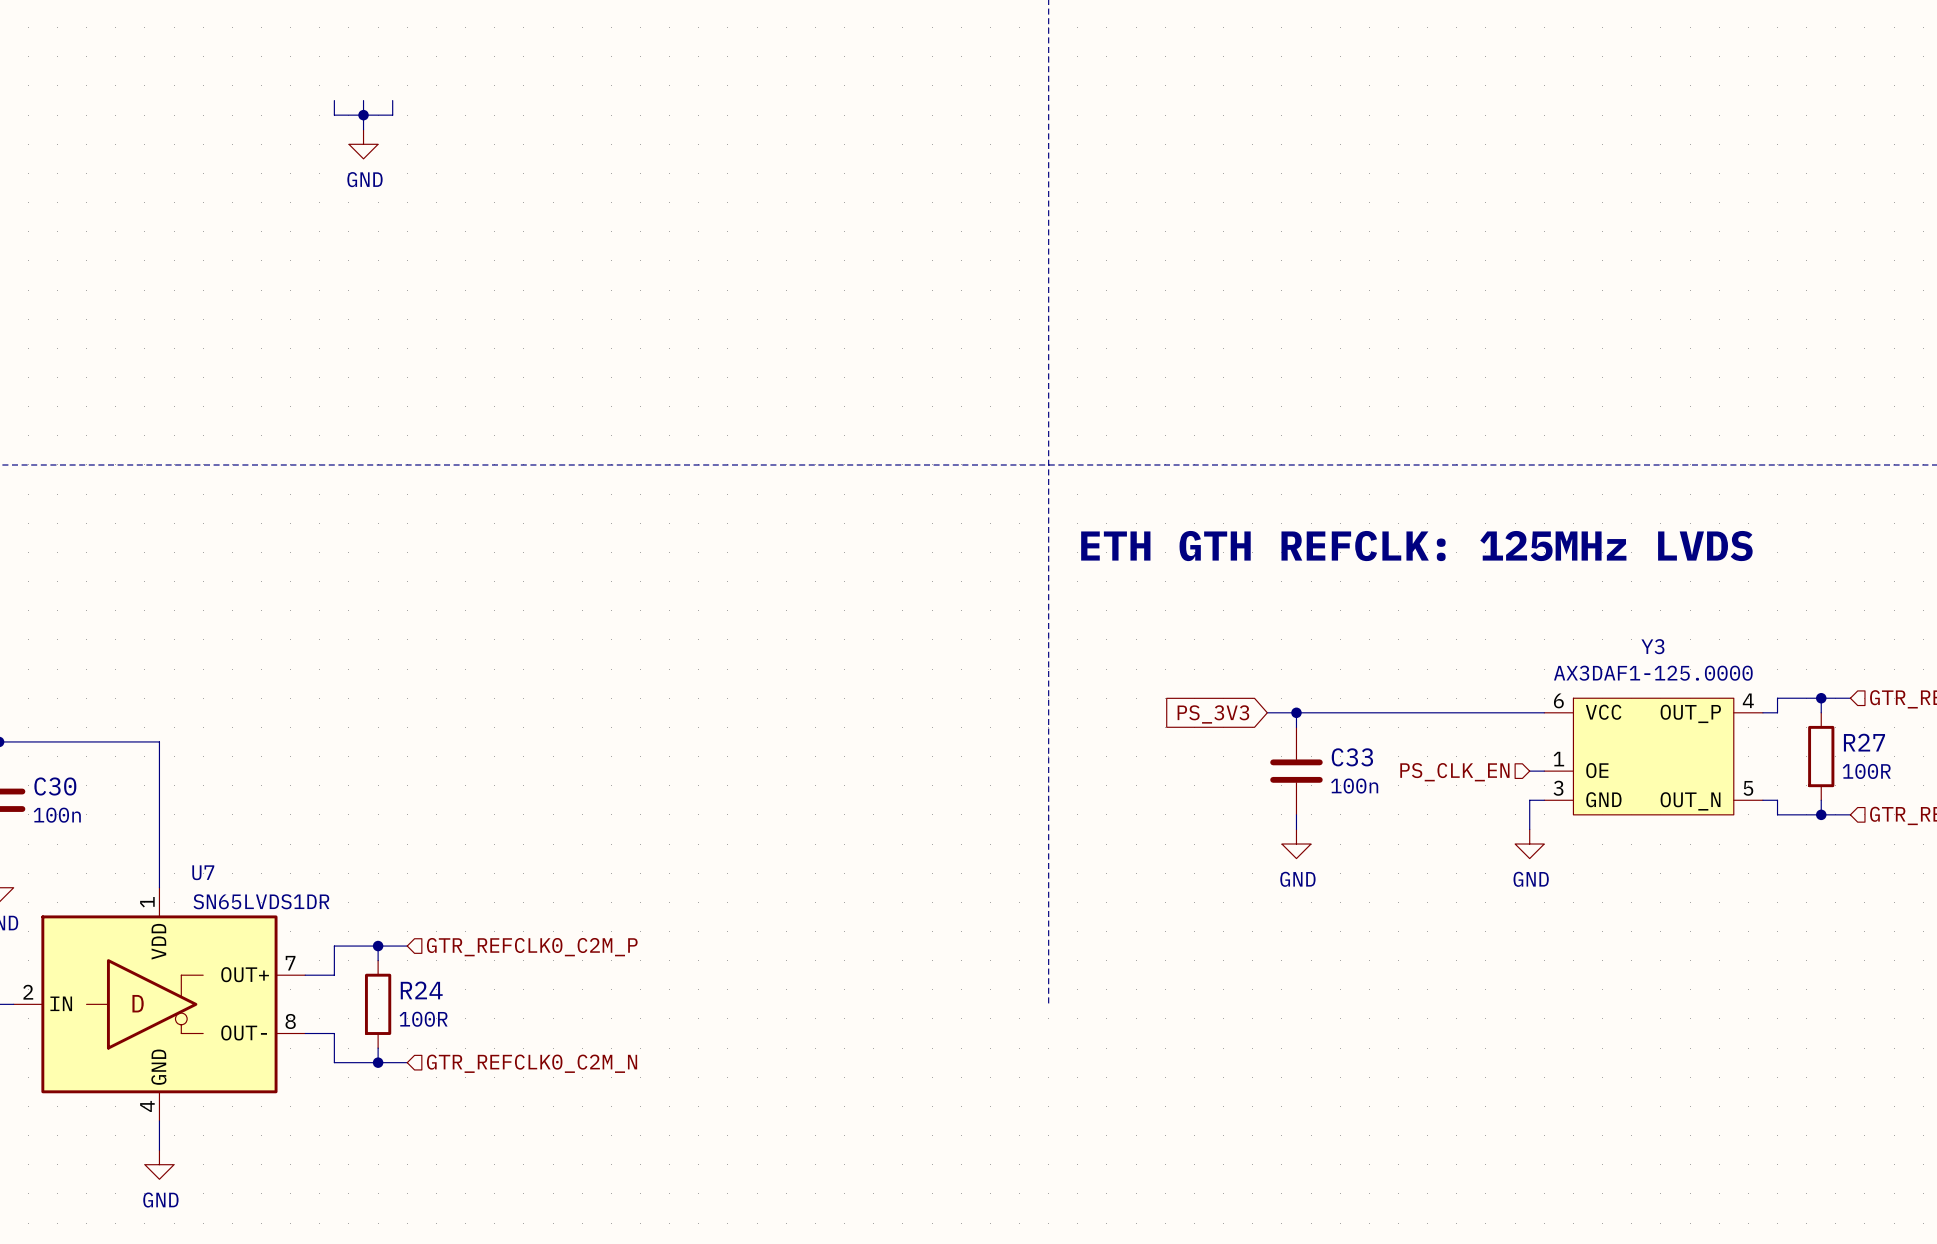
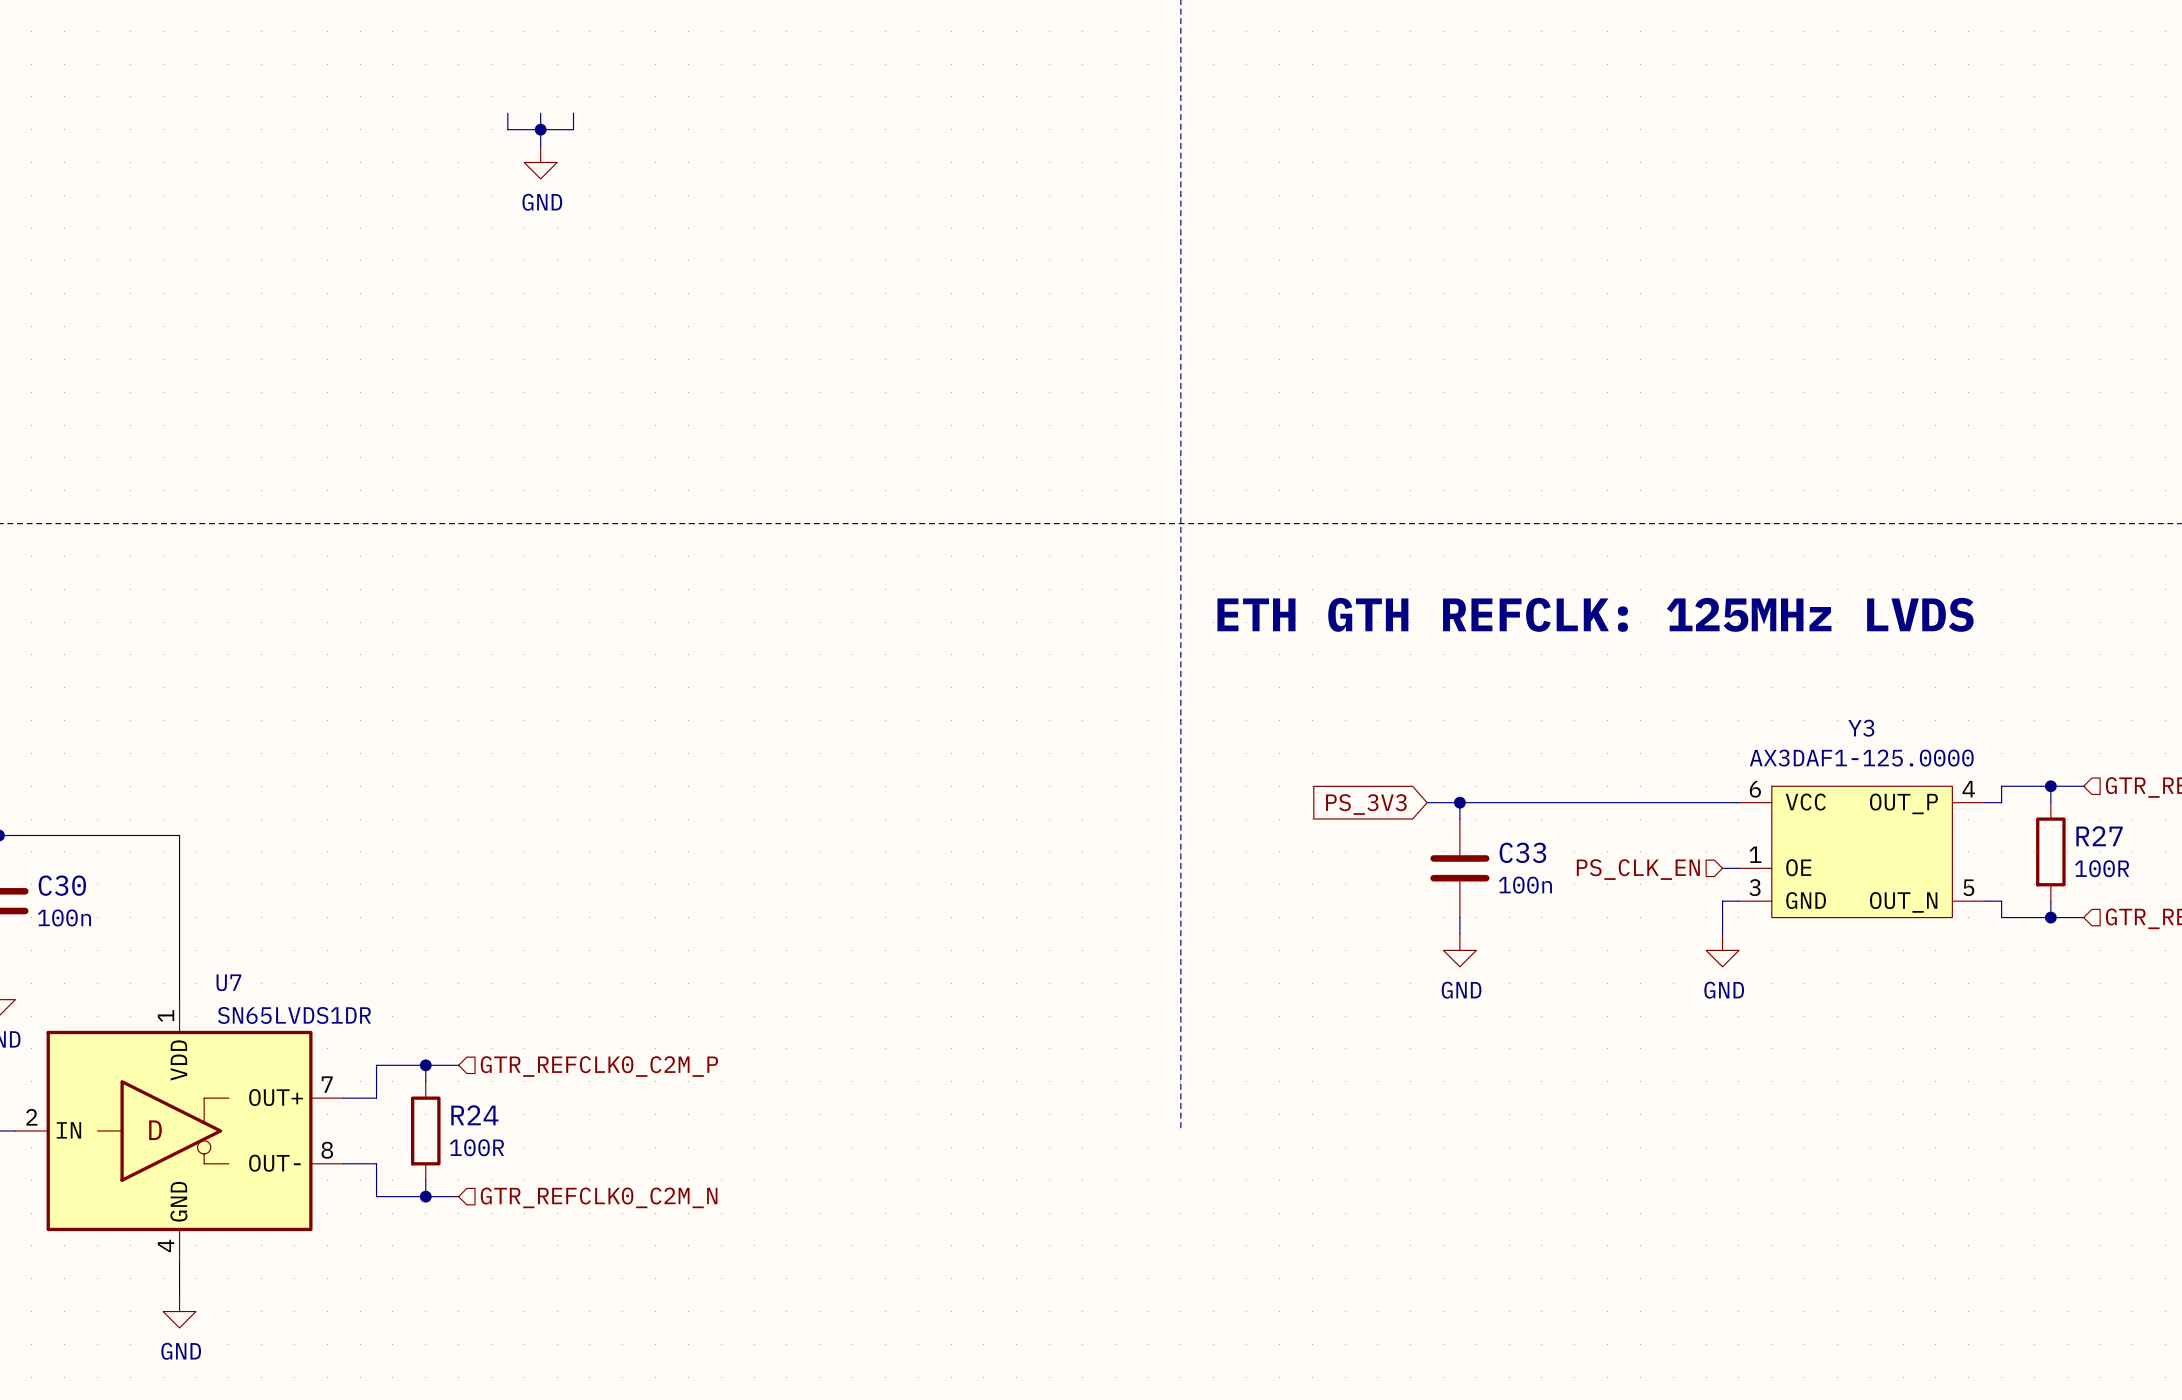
wire: (334, 100) (334, 115) (392, 115) (392, 100) -> (507, 113) (507, 129) (573, 129) (573, 113)
wire: (363, 100) (363, 129) -> (540, 113) (540, 146)
junction: (363, 115) -> none
junction: none -> (540, 129)
power symbol position: GND (363, 144) -> GND (540, 162)

